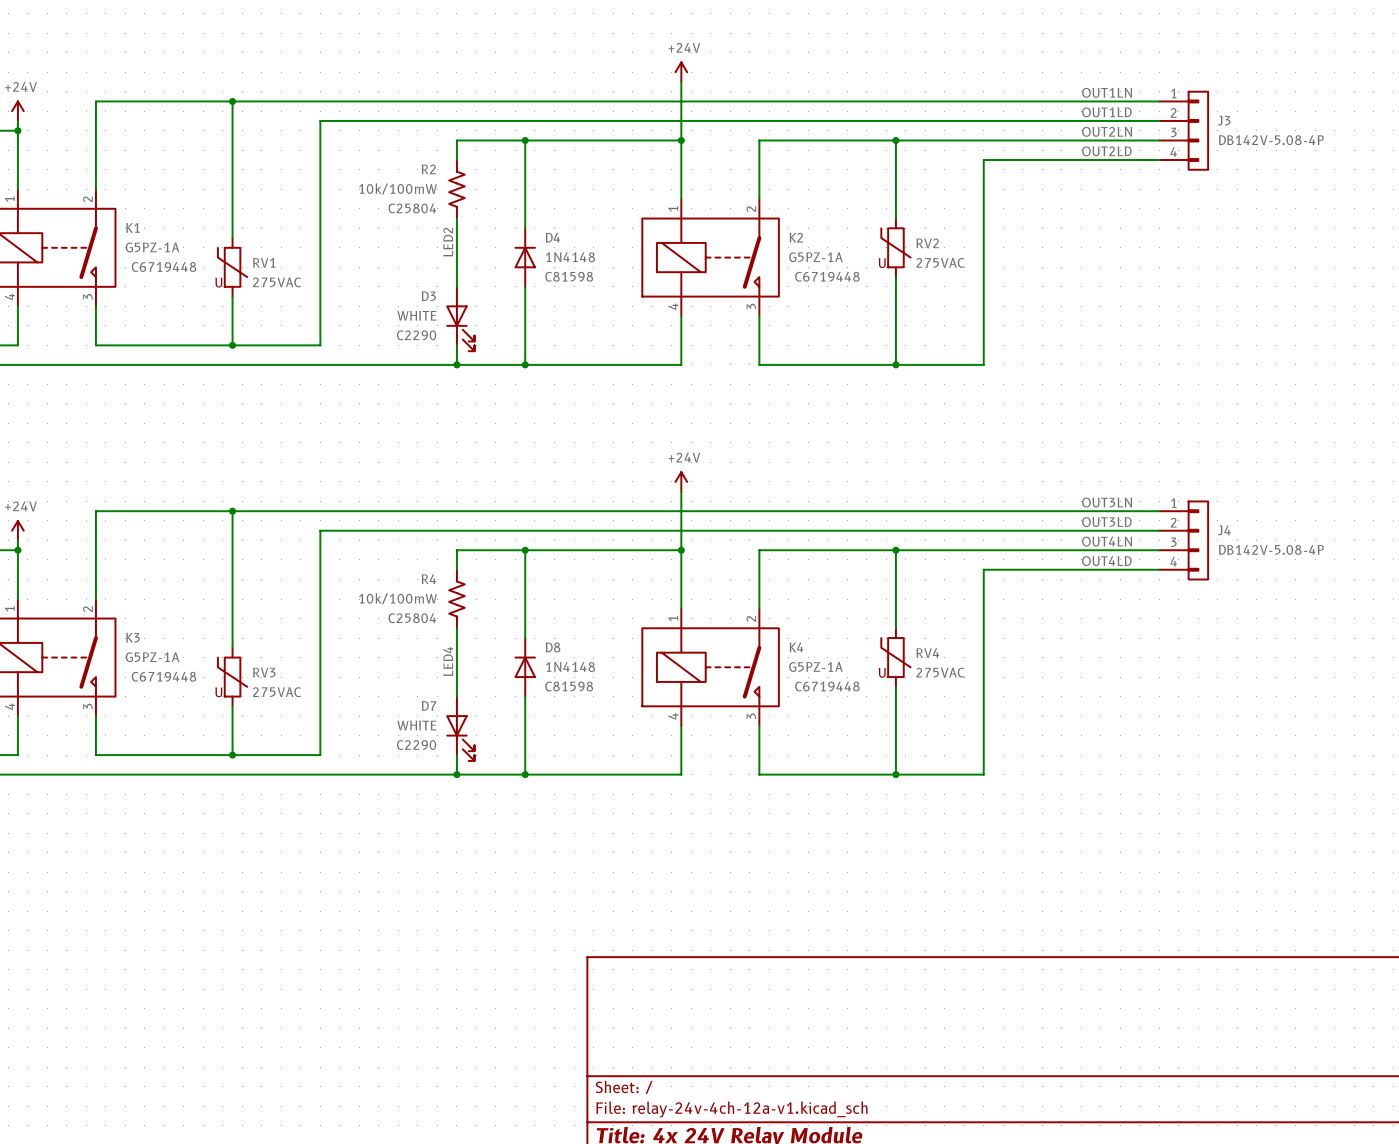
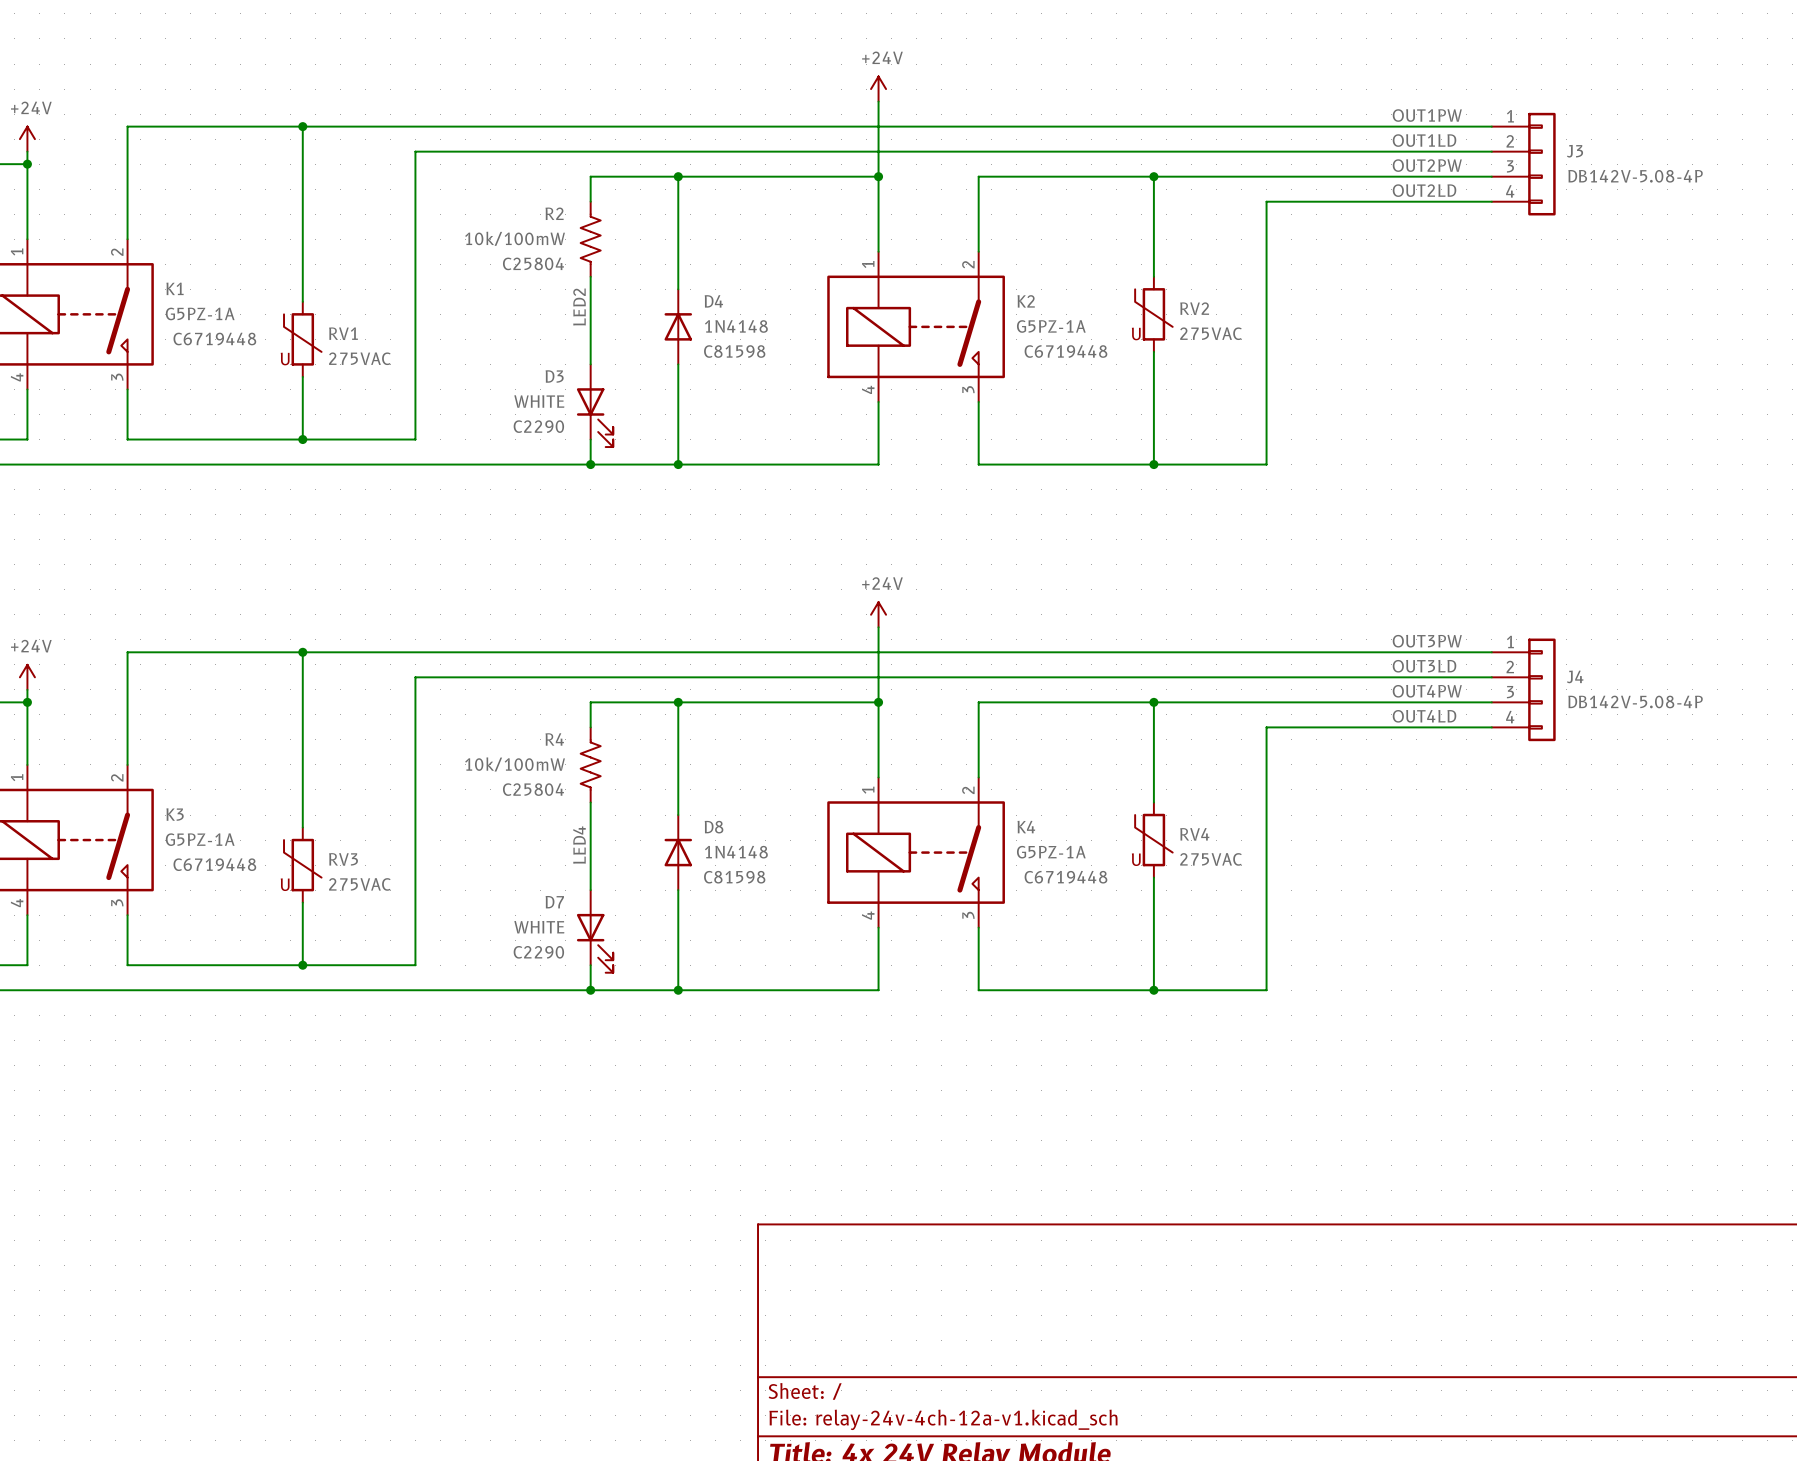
label: OUT1LN (1107, 92) -> OUT1PW (1427, 115)
label: OUT2LN (1107, 131) -> OUT2PW (1427, 165)
label: OUT3LN (1107, 502) -> OUT3PW (1427, 641)
label: OUT4LN (1107, 541) -> OUT4PW (1427, 691)

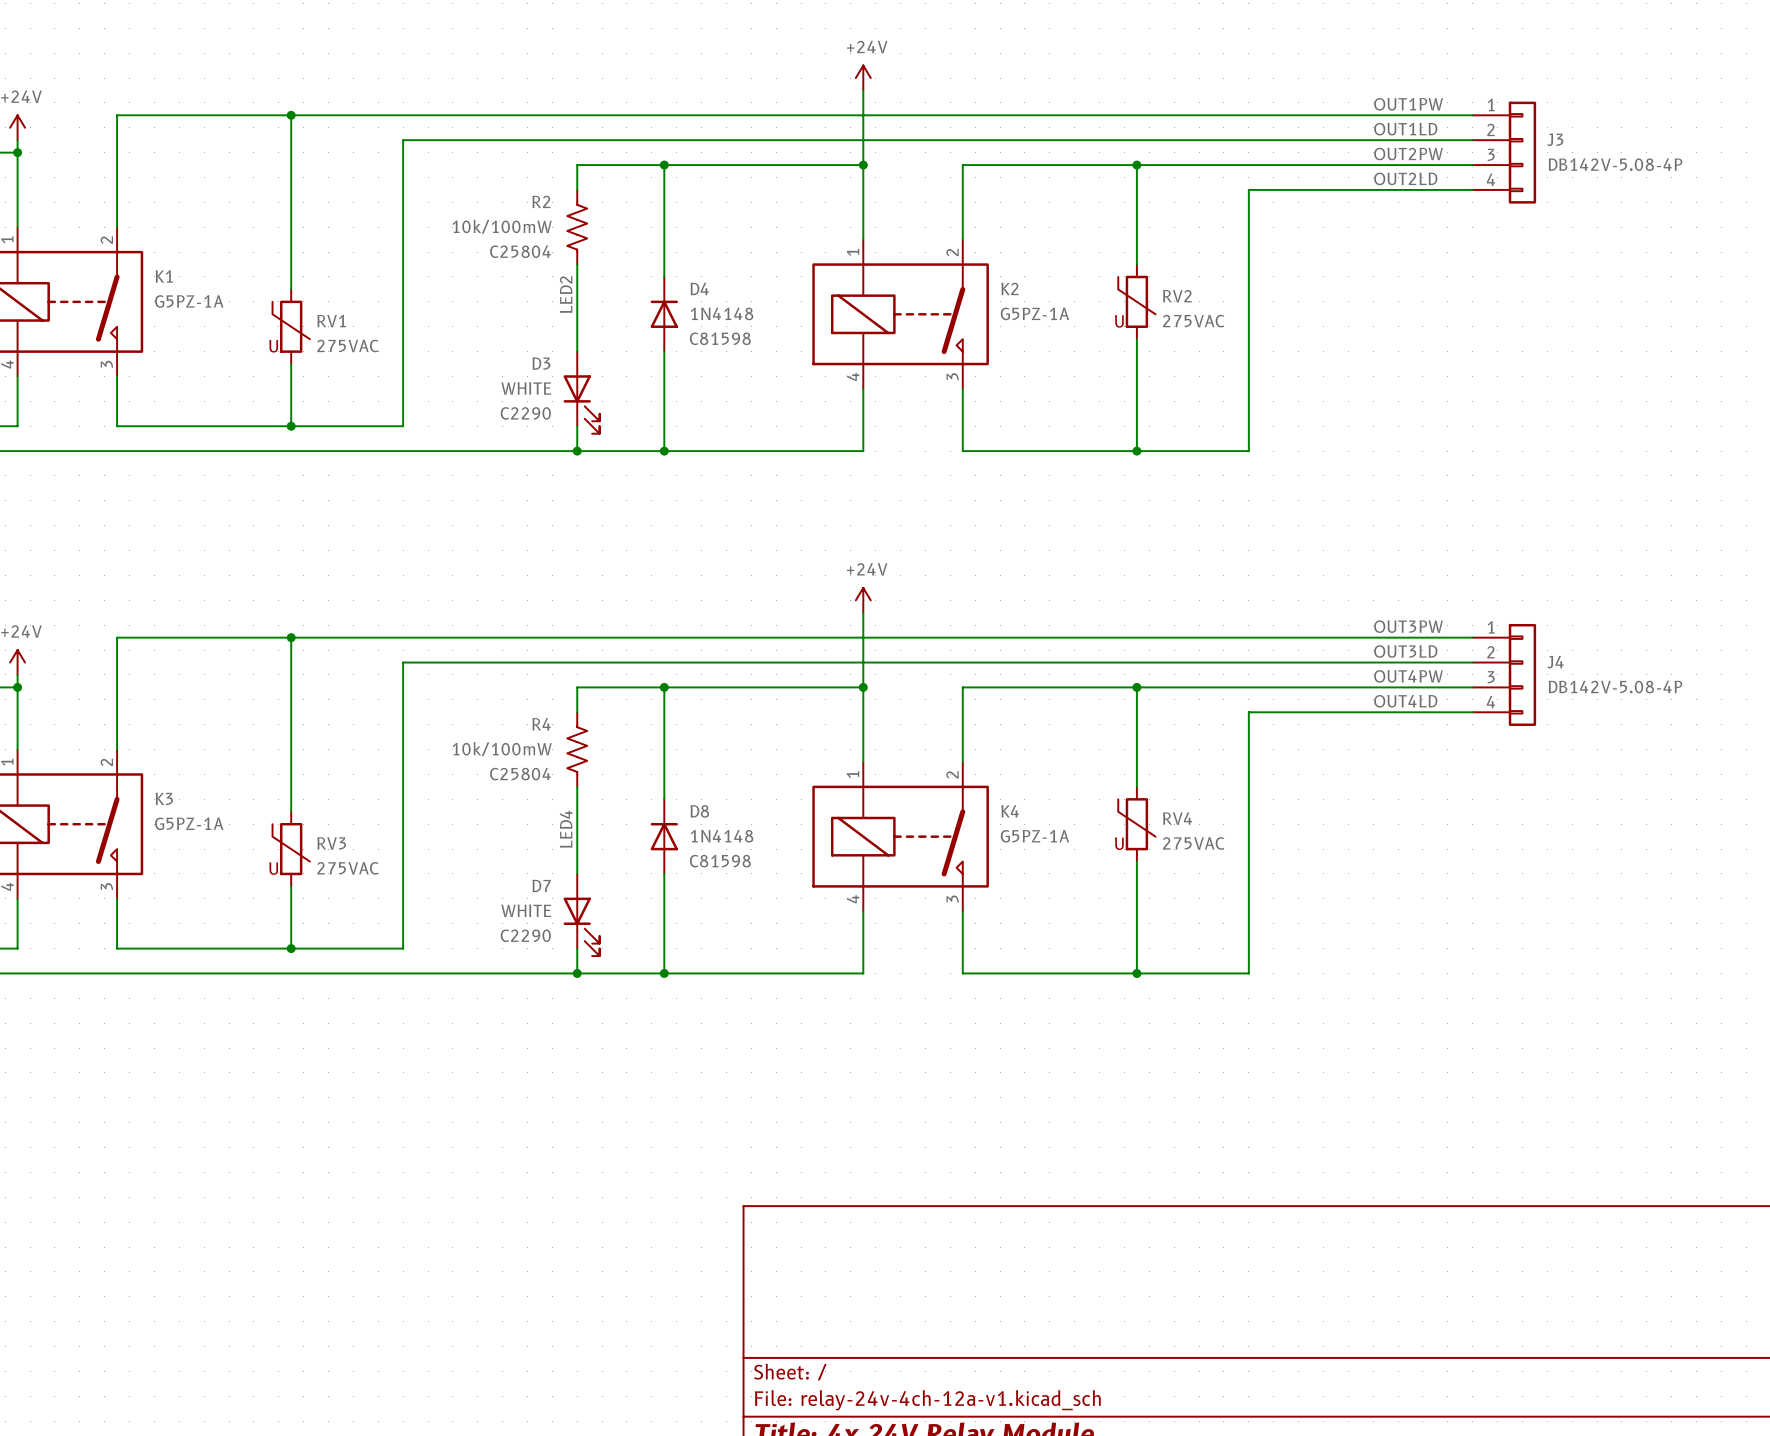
K1 text: C6719448 (214, 338) -> none
K2 text: C6719448 (1065, 351) -> none
K3 text: C6719448 (214, 864) -> none
K4 text: C6719448 (1065, 877) -> none

